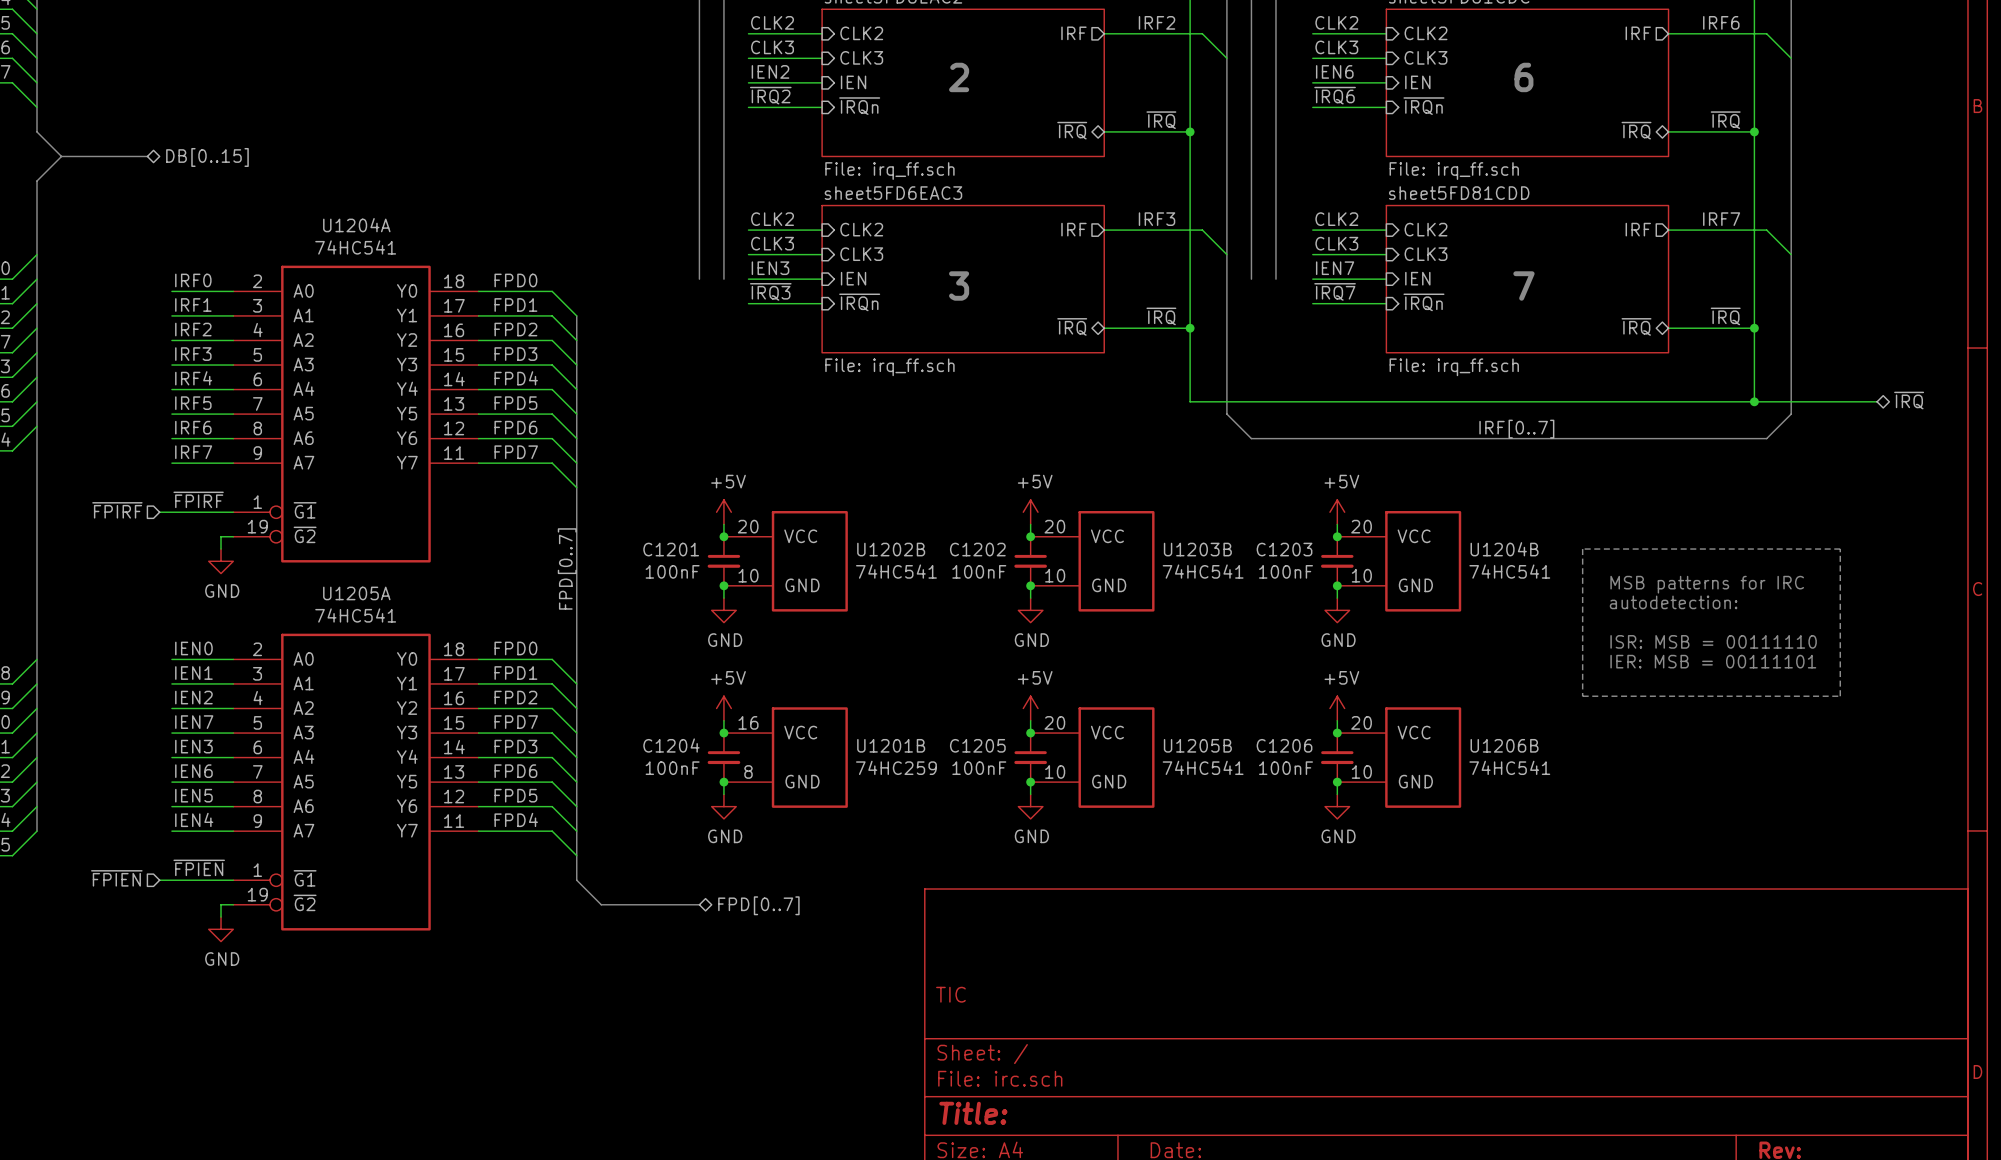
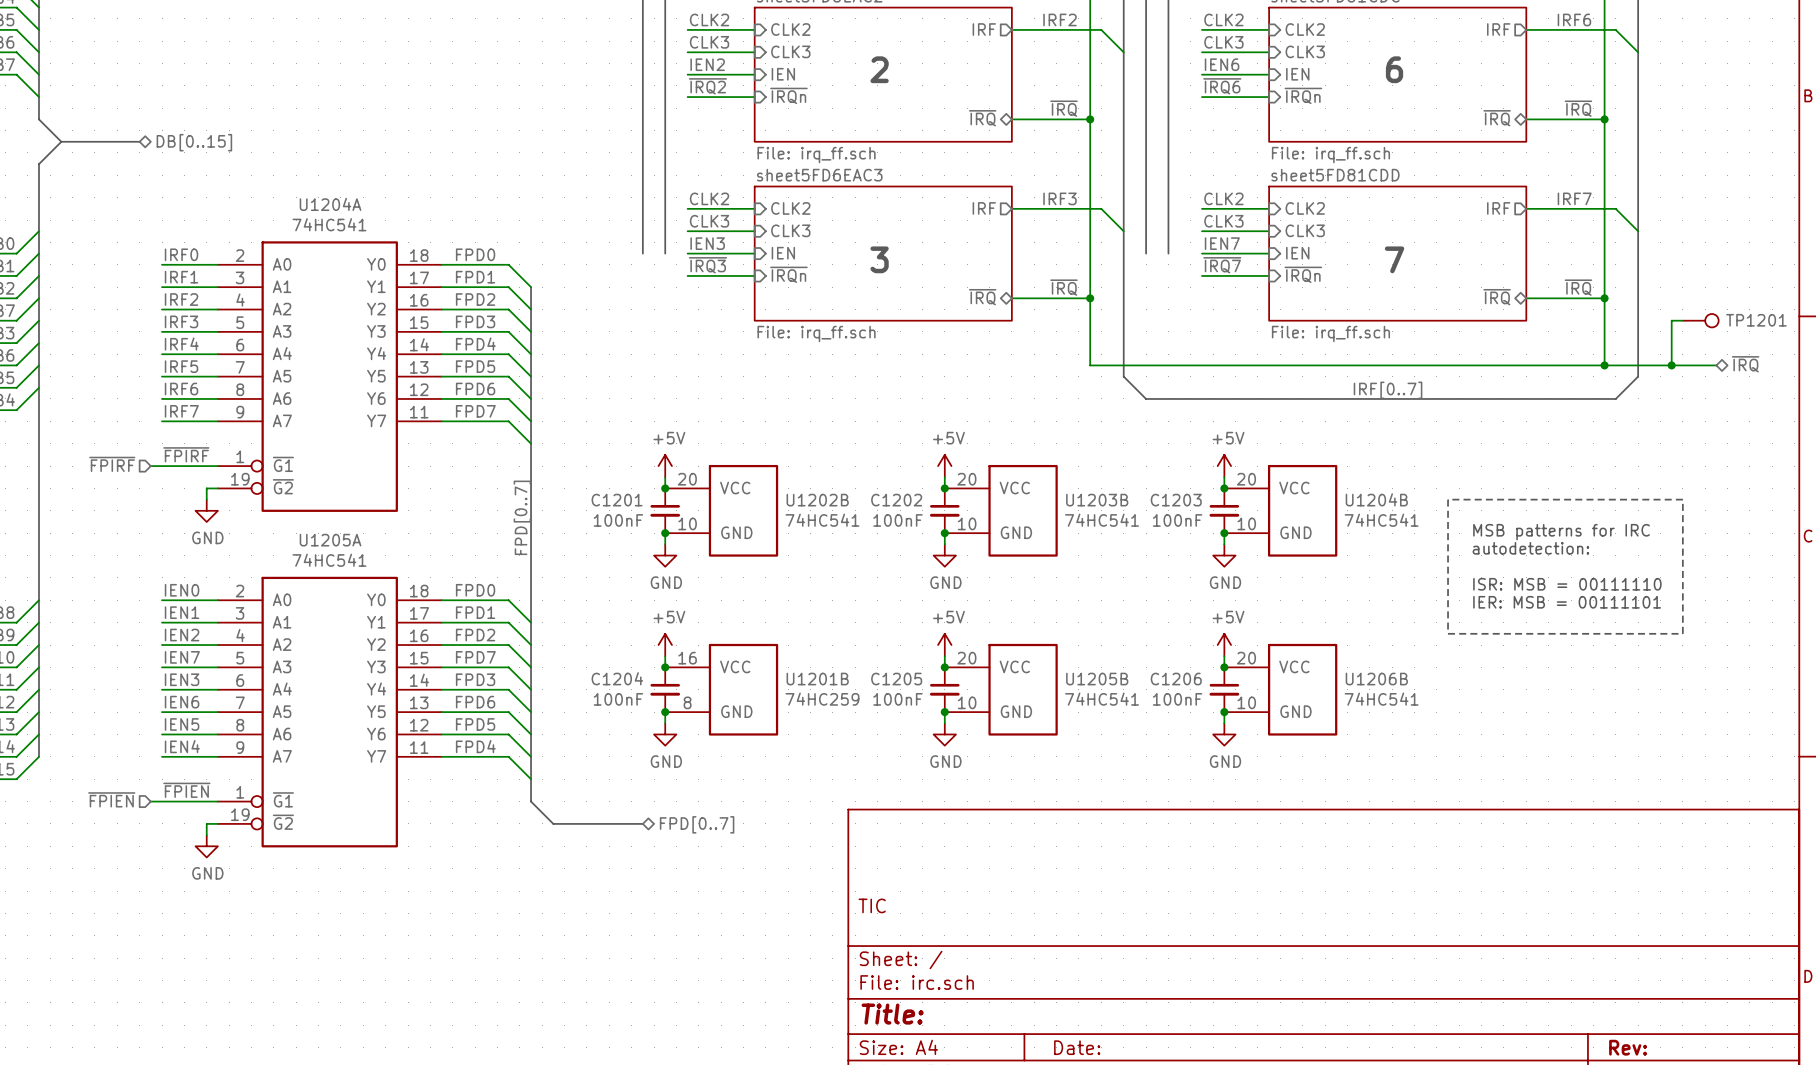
wire: none -> (1682, 320) (1671, 320) (1671, 365)
TP1201: none -> (1700, 320)
junction: none -> (1671, 365)

